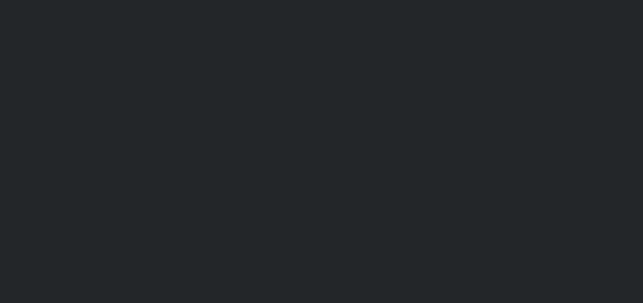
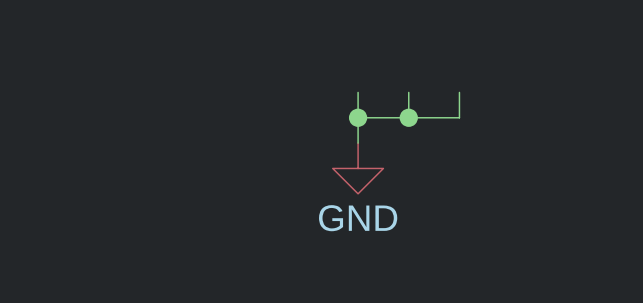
wire: none -> (358, 92) (358, 143)
wire: none -> (408, 92) (408, 117)
wire: none -> (459, 92) (459, 117) (358, 117)
junction: none -> (358, 117)
junction: none -> (408, 117)
power symbol: none -> GND (358, 168)

